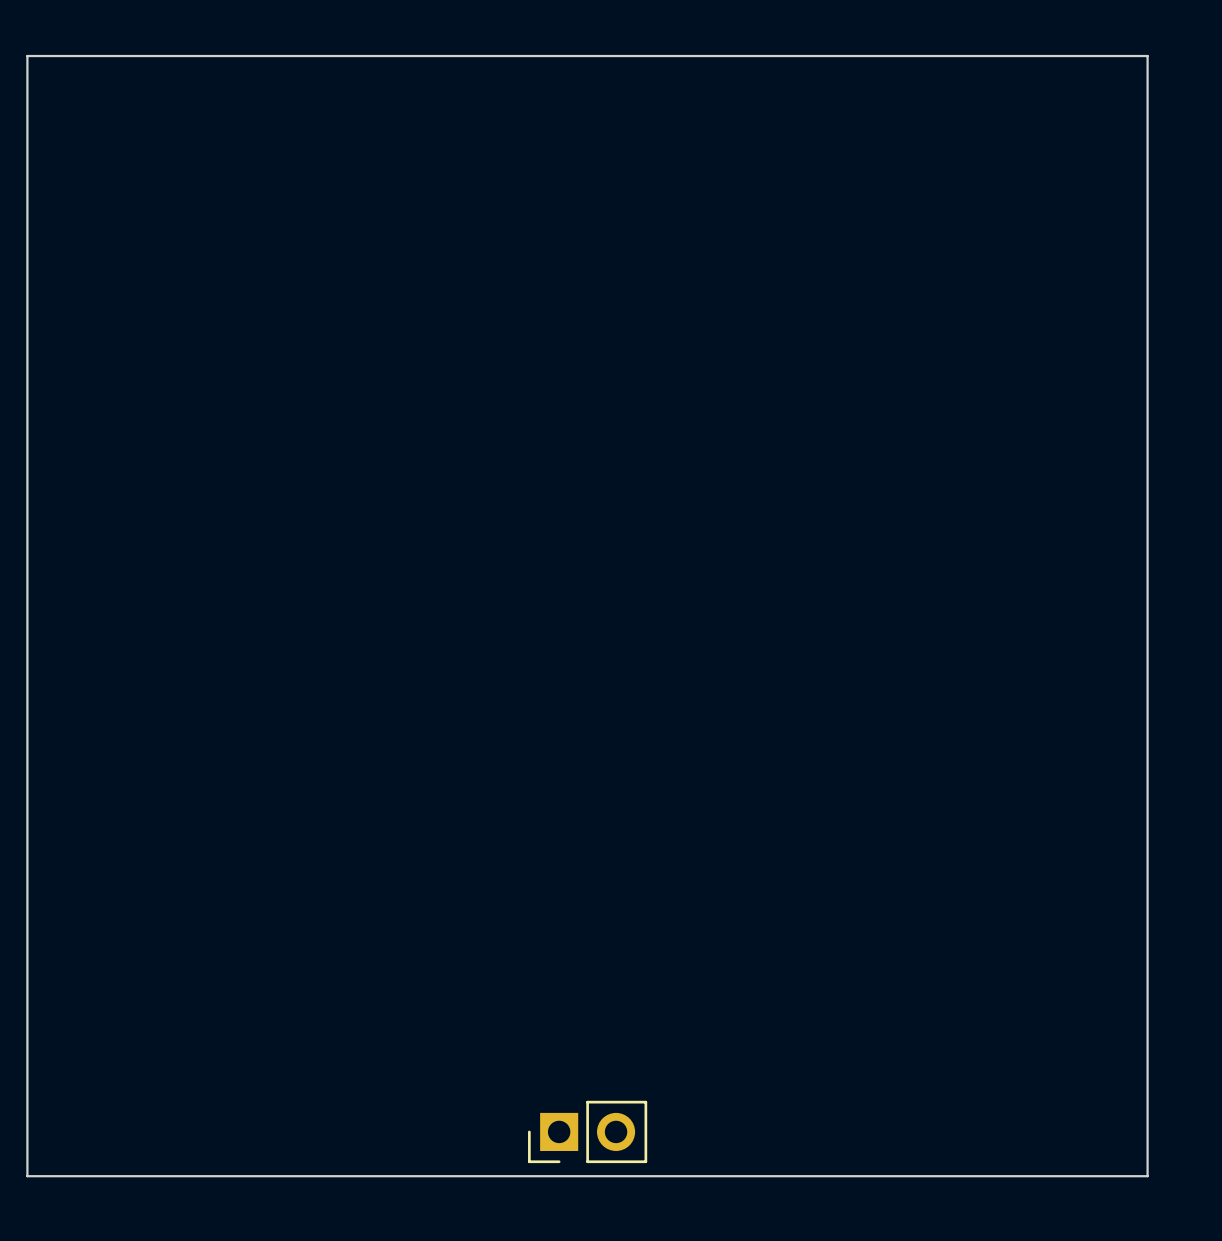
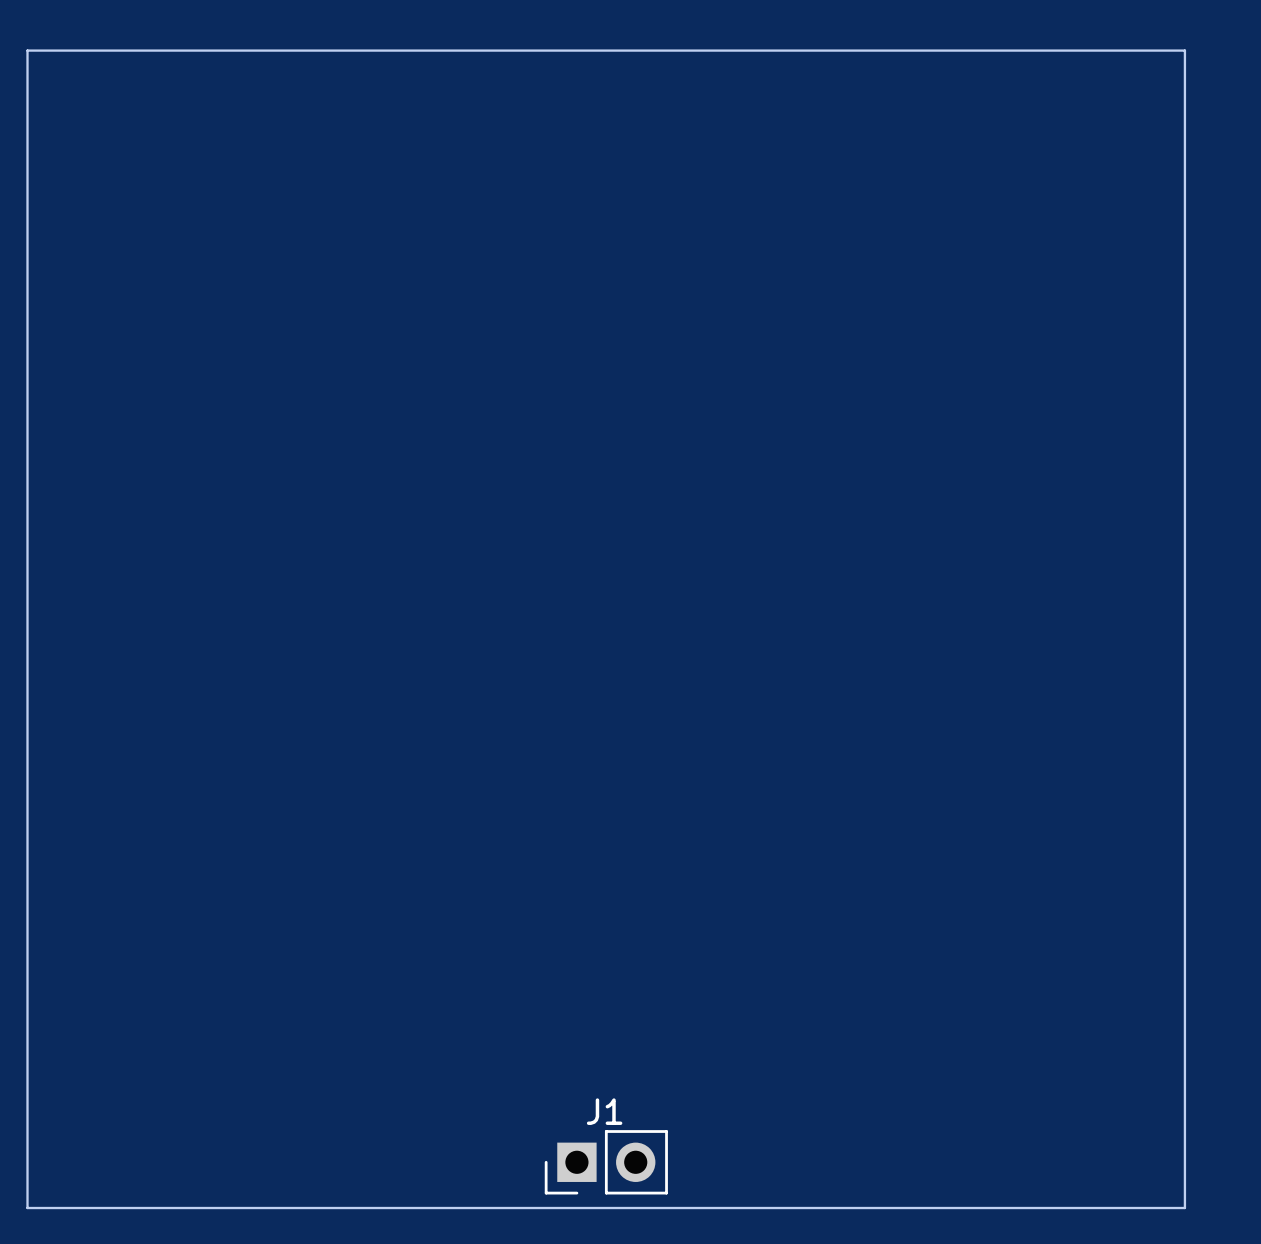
J1 name: none -> J1 (604, 1111)

